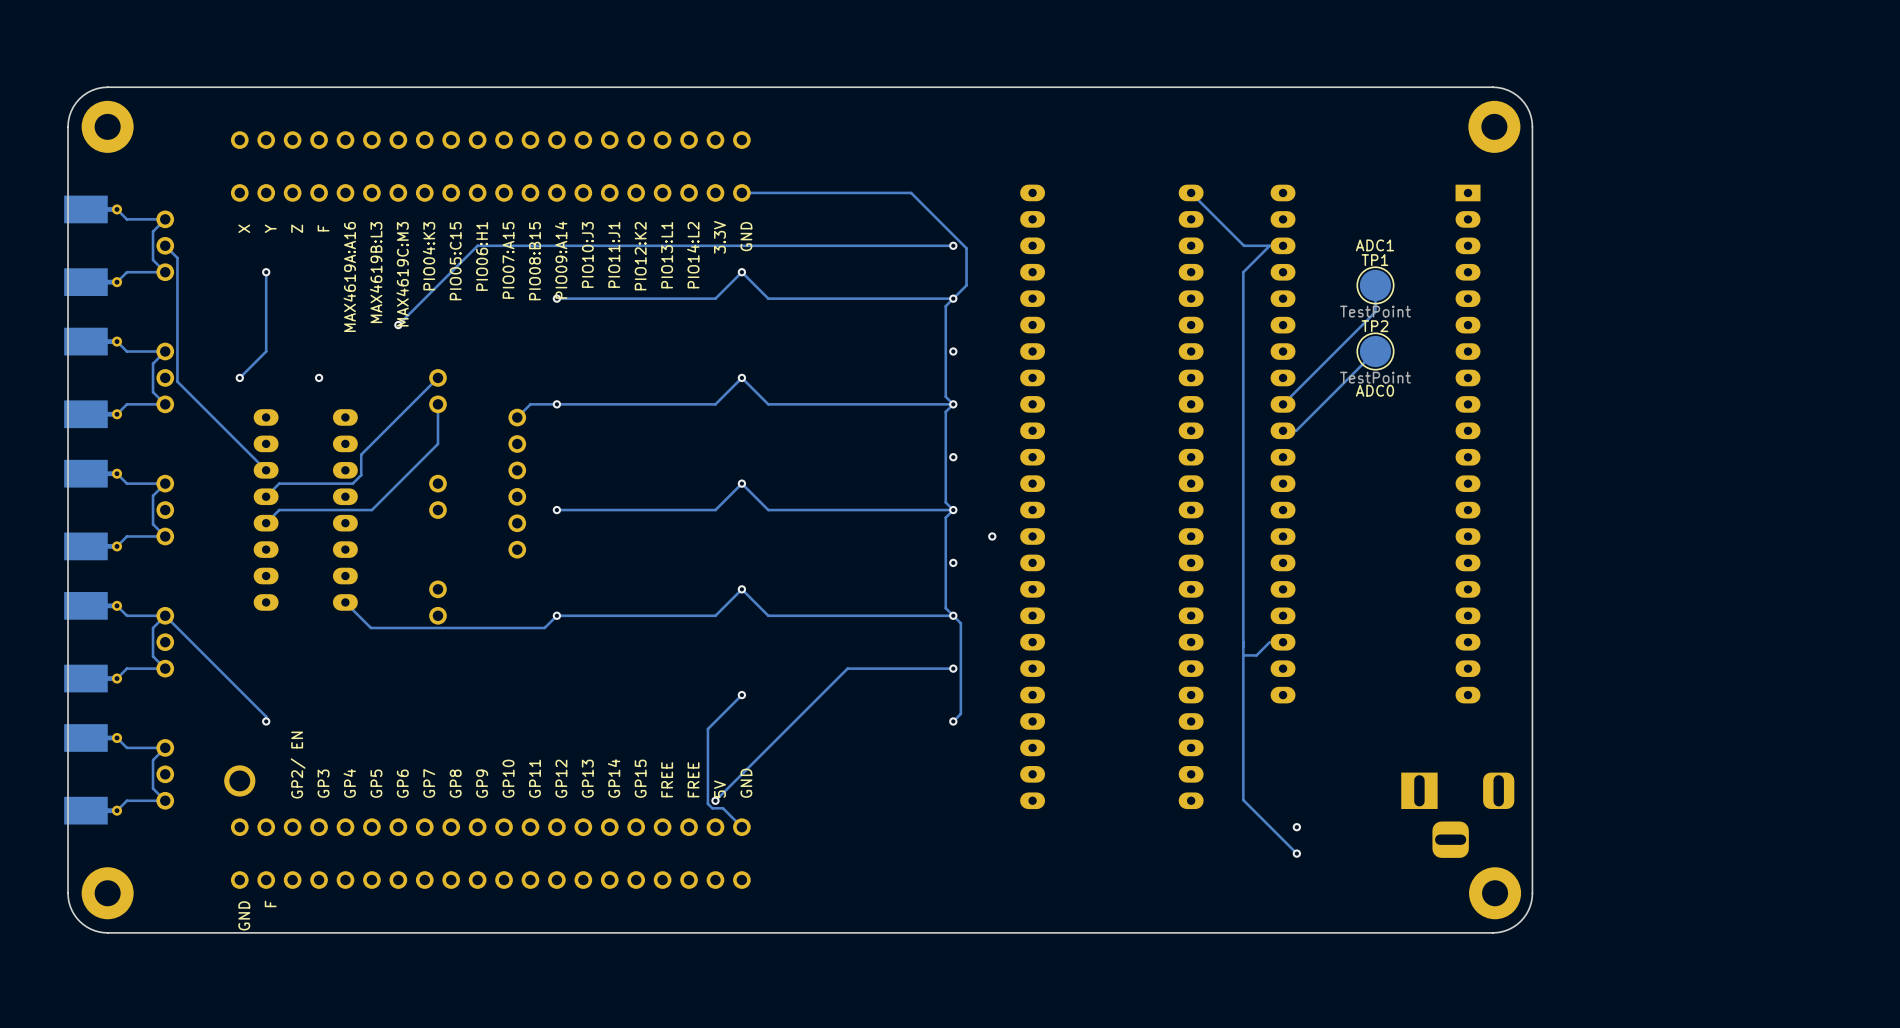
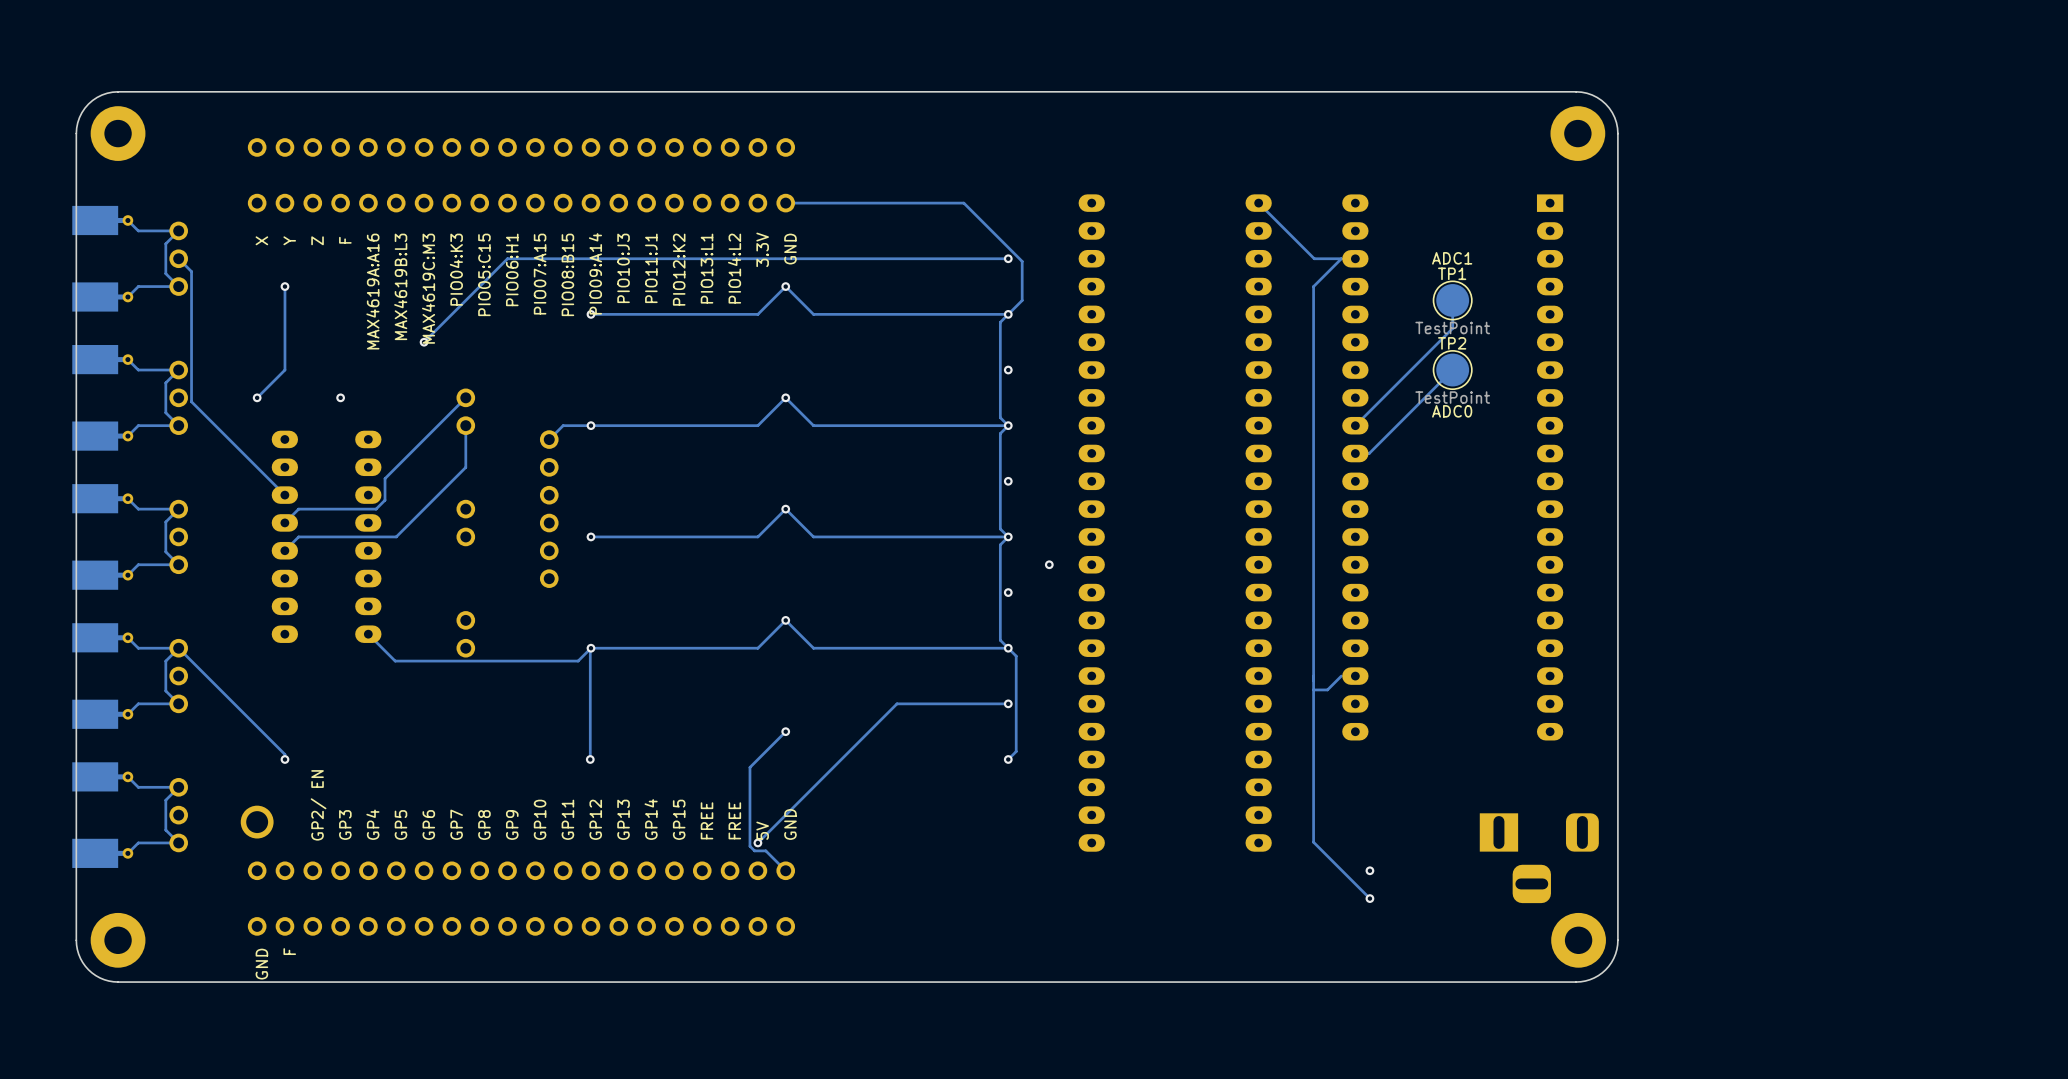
track: none -> (590, 648) (590, 759)
via: none -> (590, 759)

